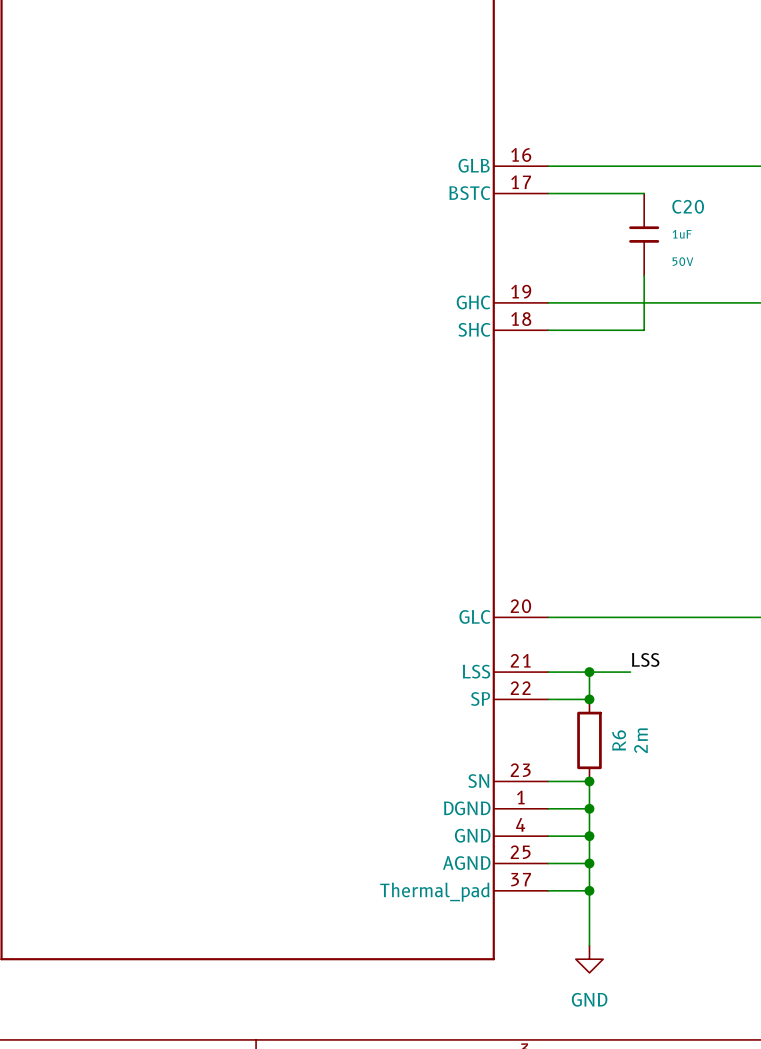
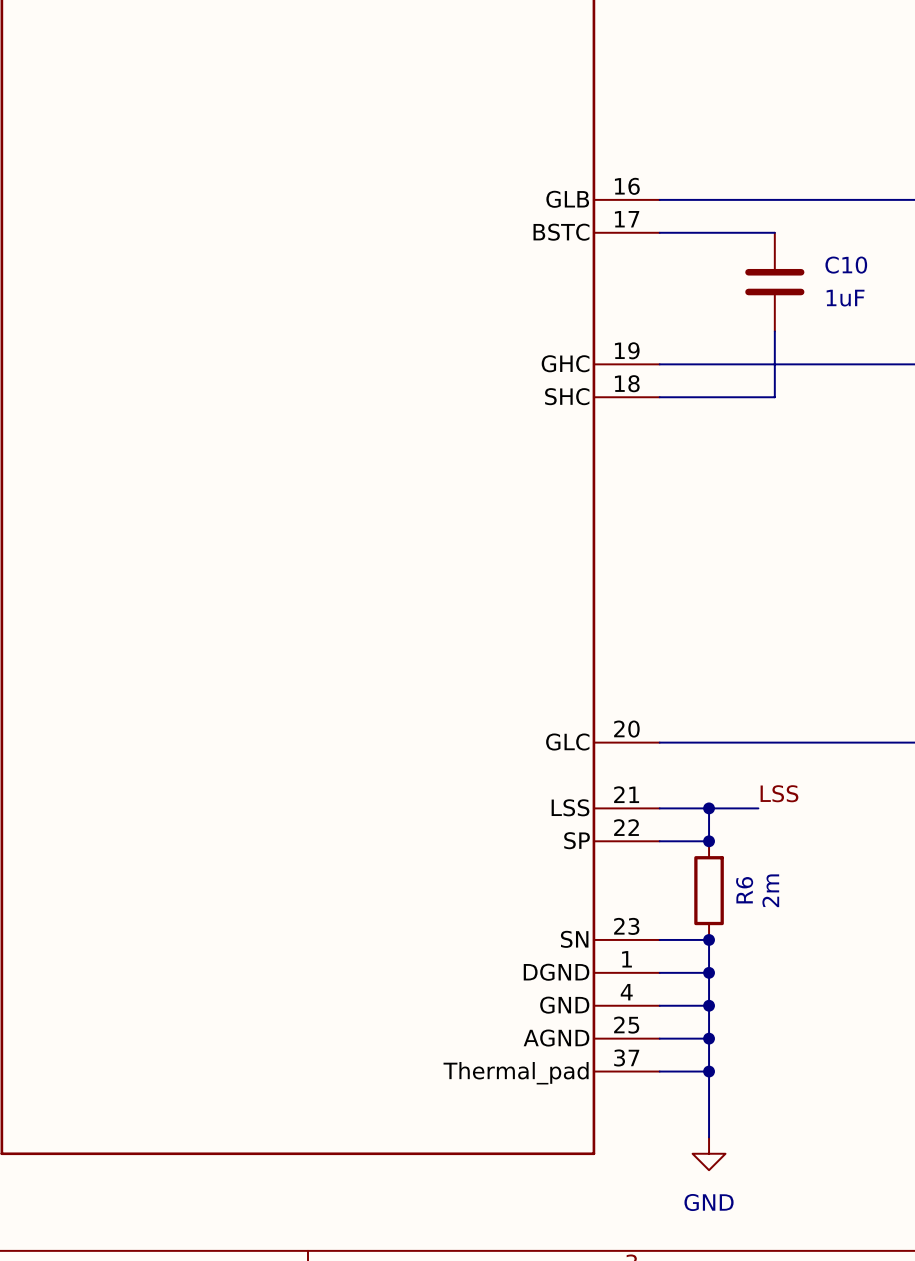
C20: 1uF (644, 234) -> none
C10: none -> 1uF (774, 282)

